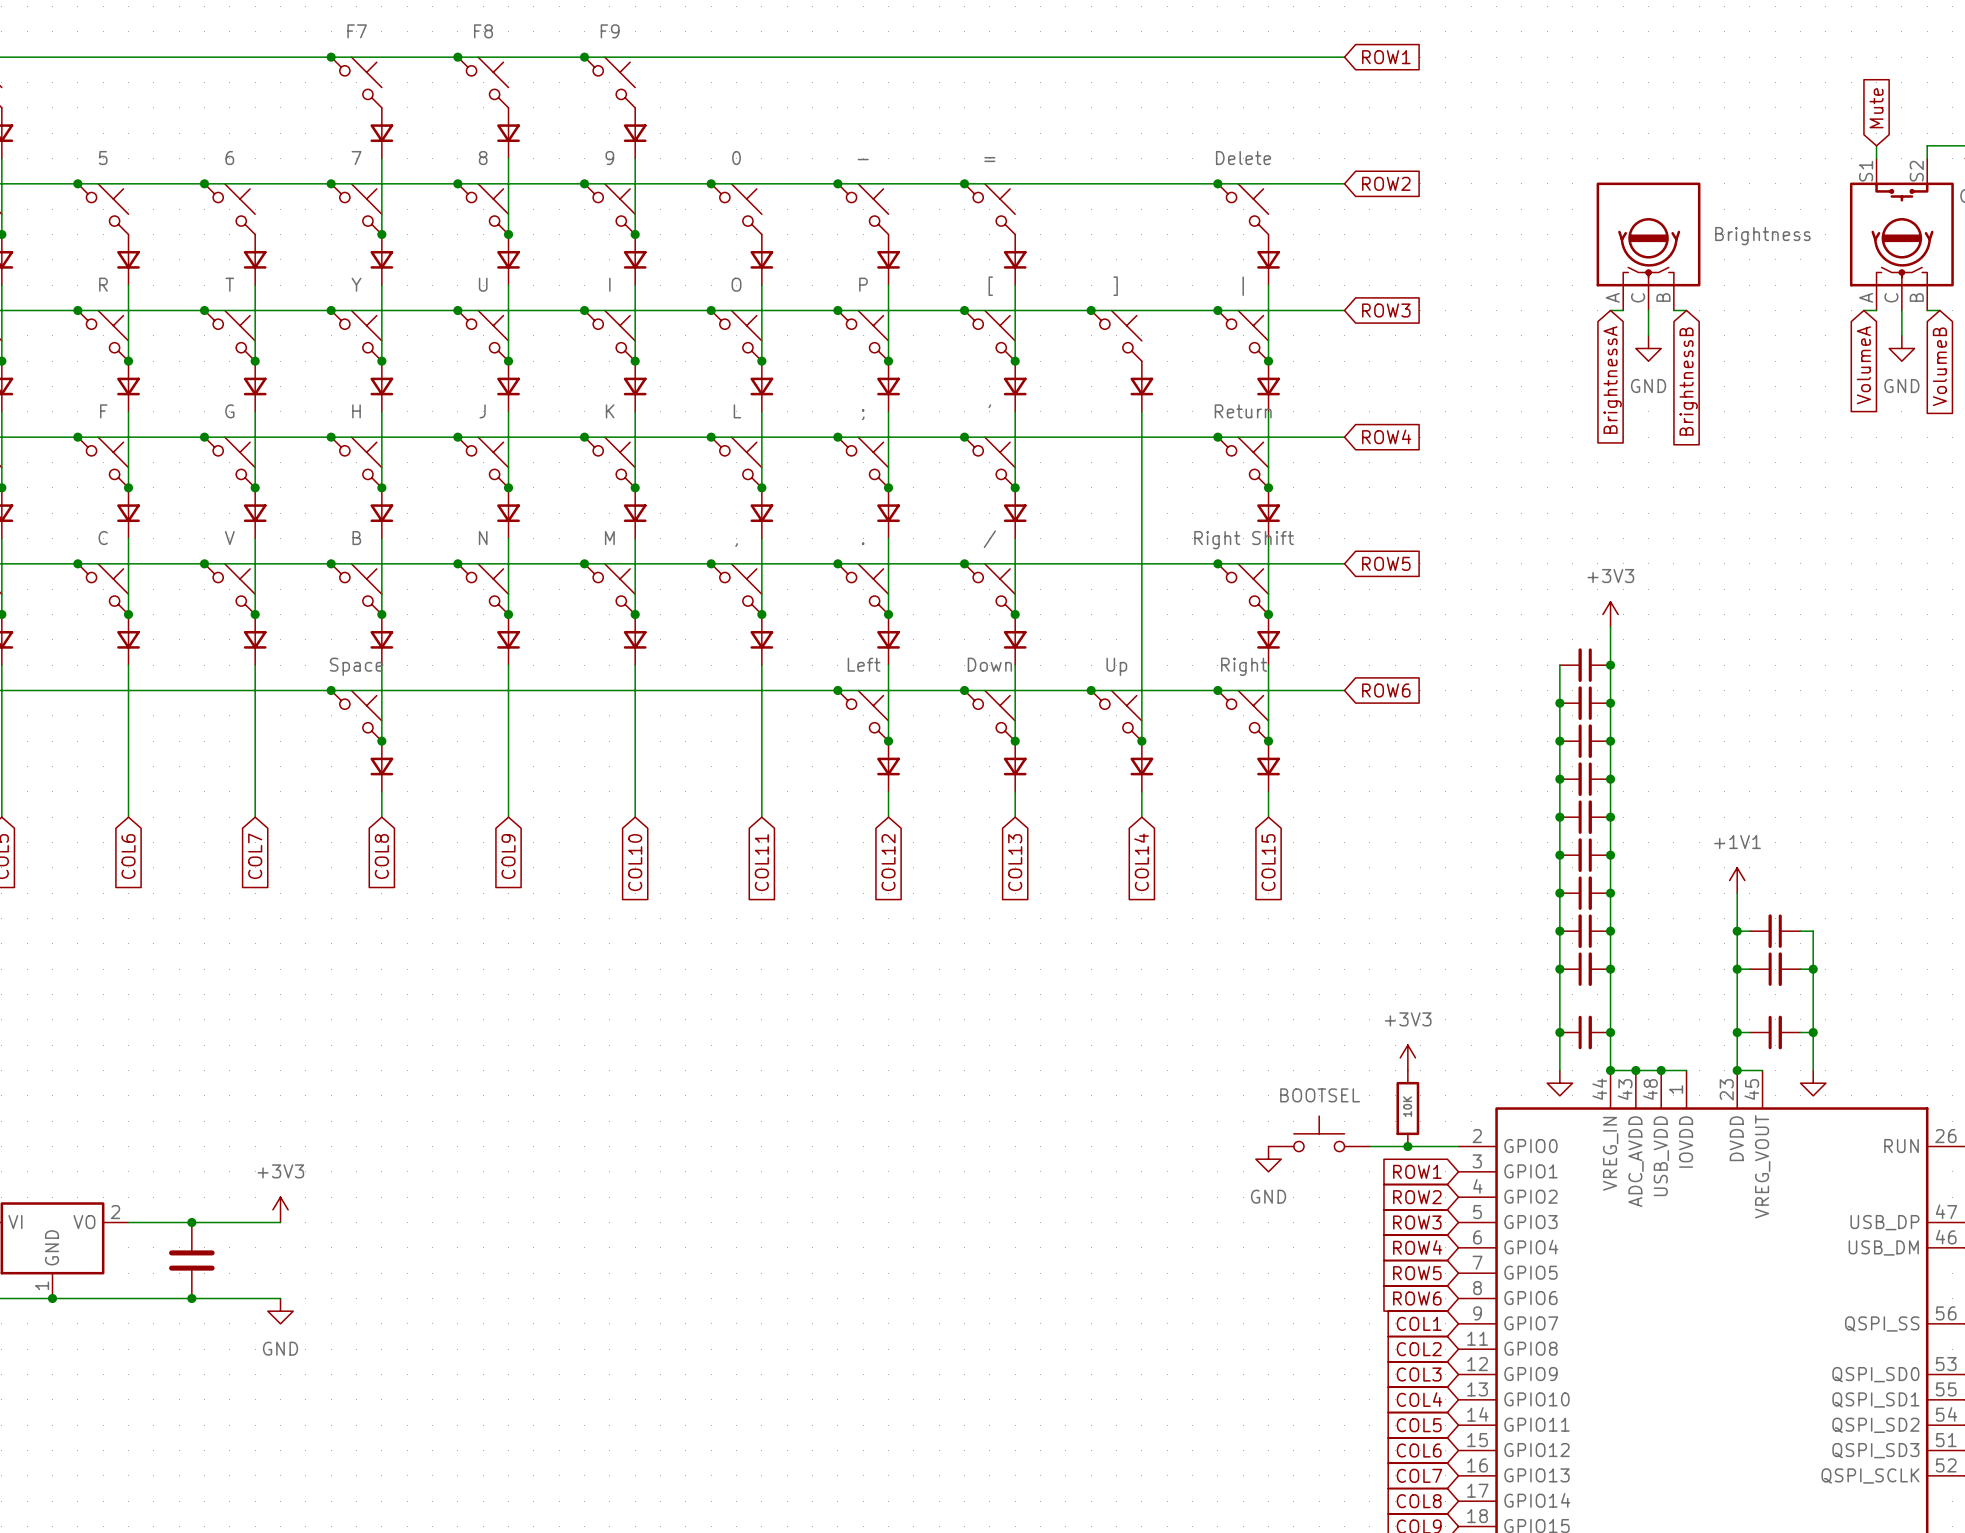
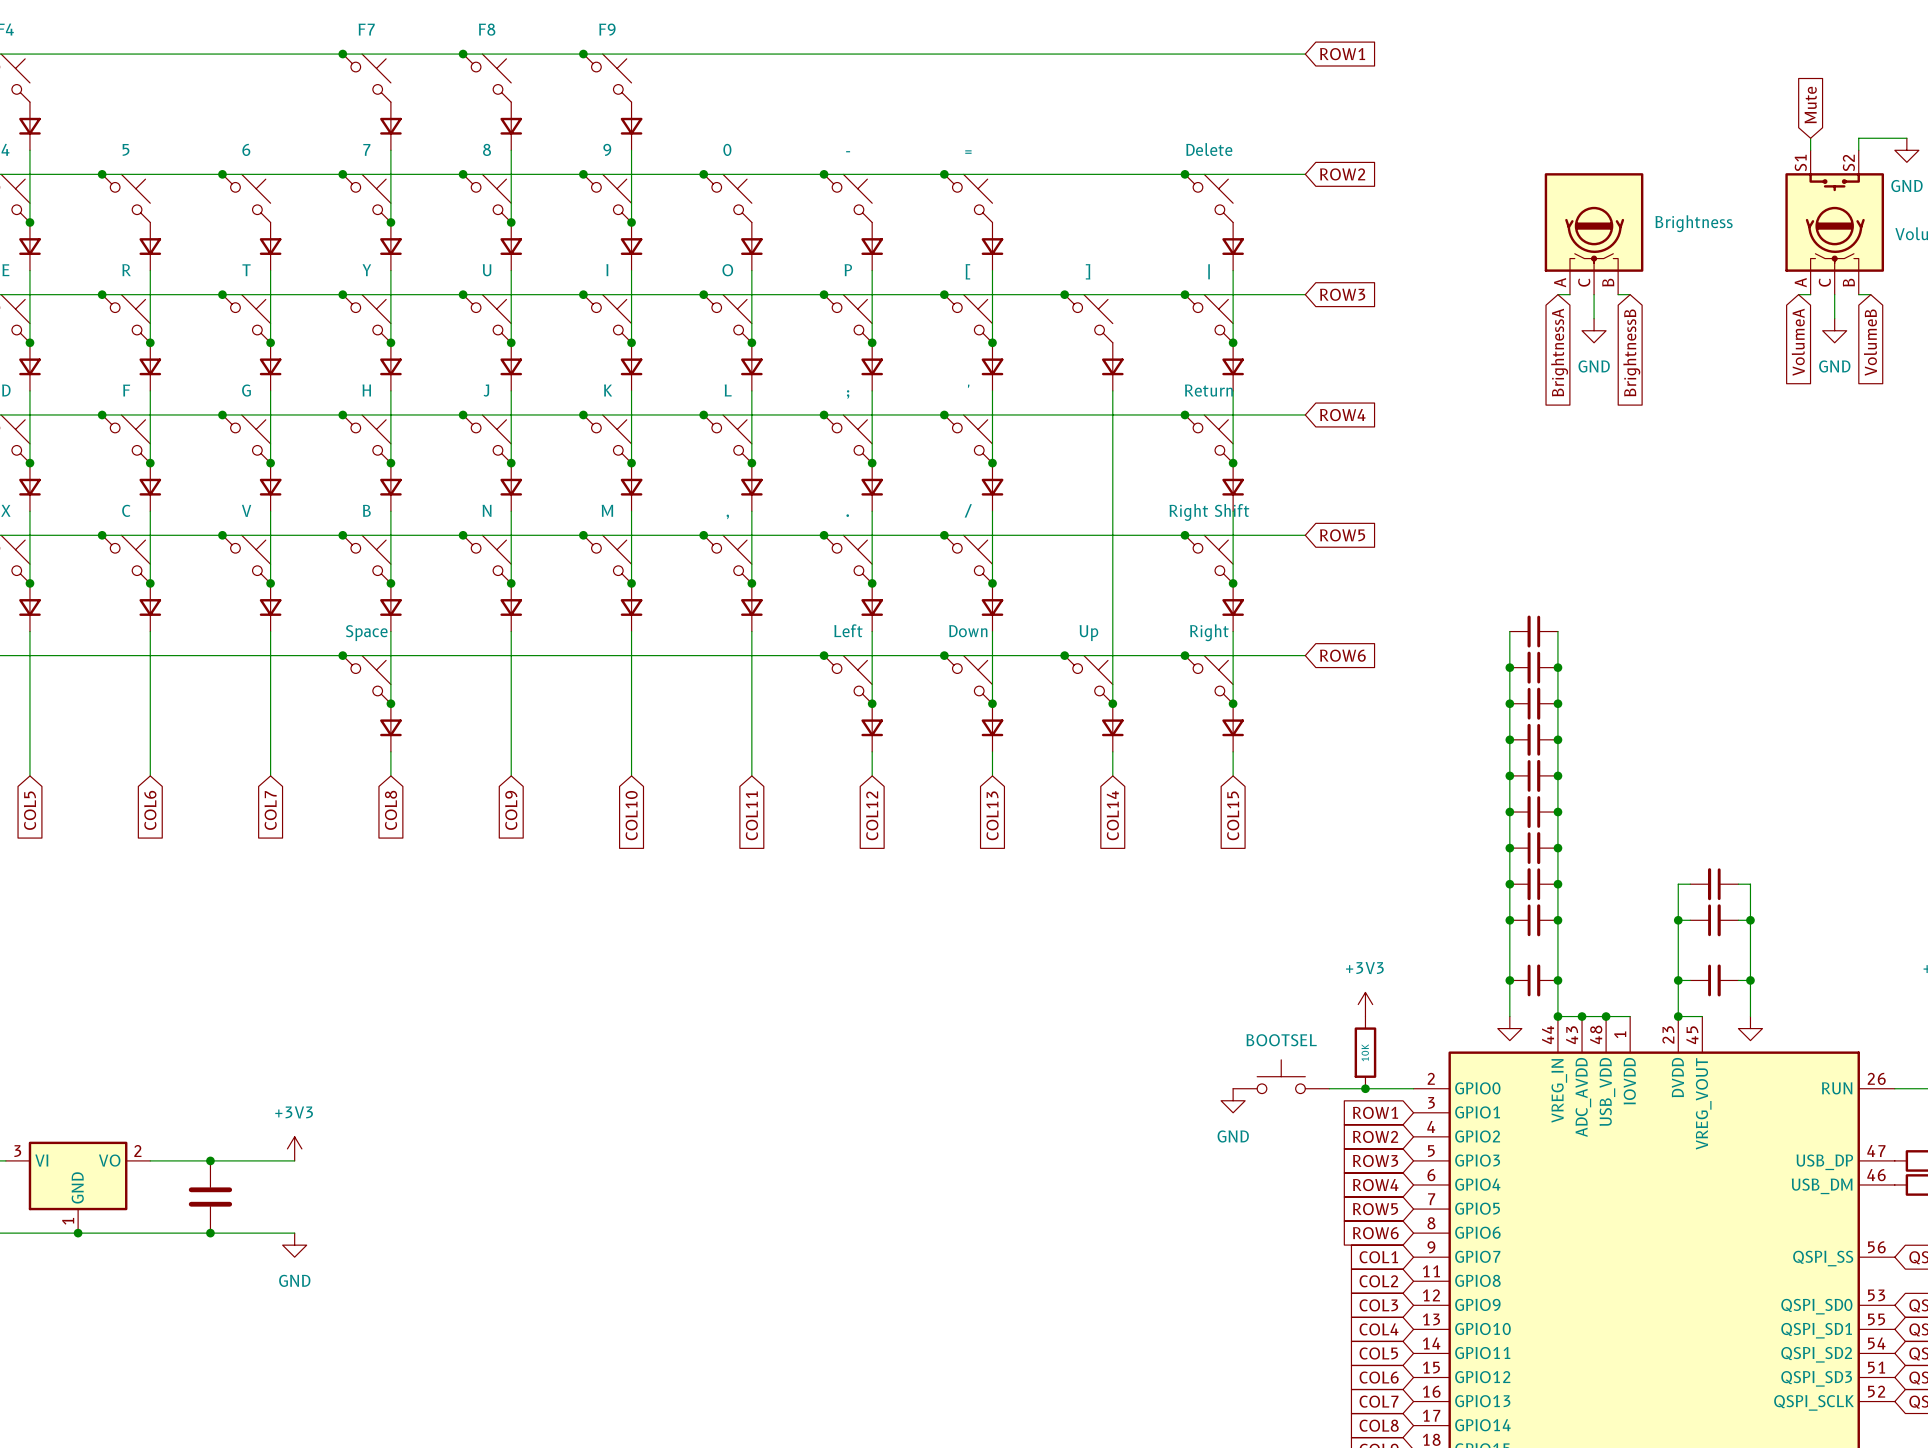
power symbol: +3V3 (1610, 614) -> none
wire: (1610, 627) (1610, 665) -> none
junction: (1610, 665) -> none
power symbol: +1V1 (1737, 880) -> none
wire: (1737, 893) (1737, 931) -> none
junction: (1737, 931) -> none

